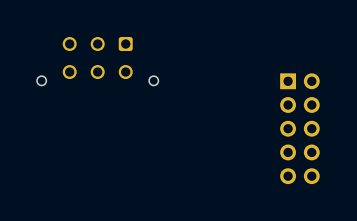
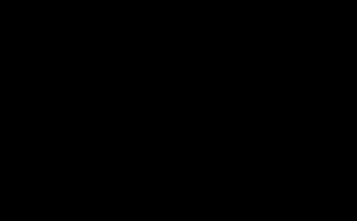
part: (97, 61) -> none
part: (299, 128) -> none

